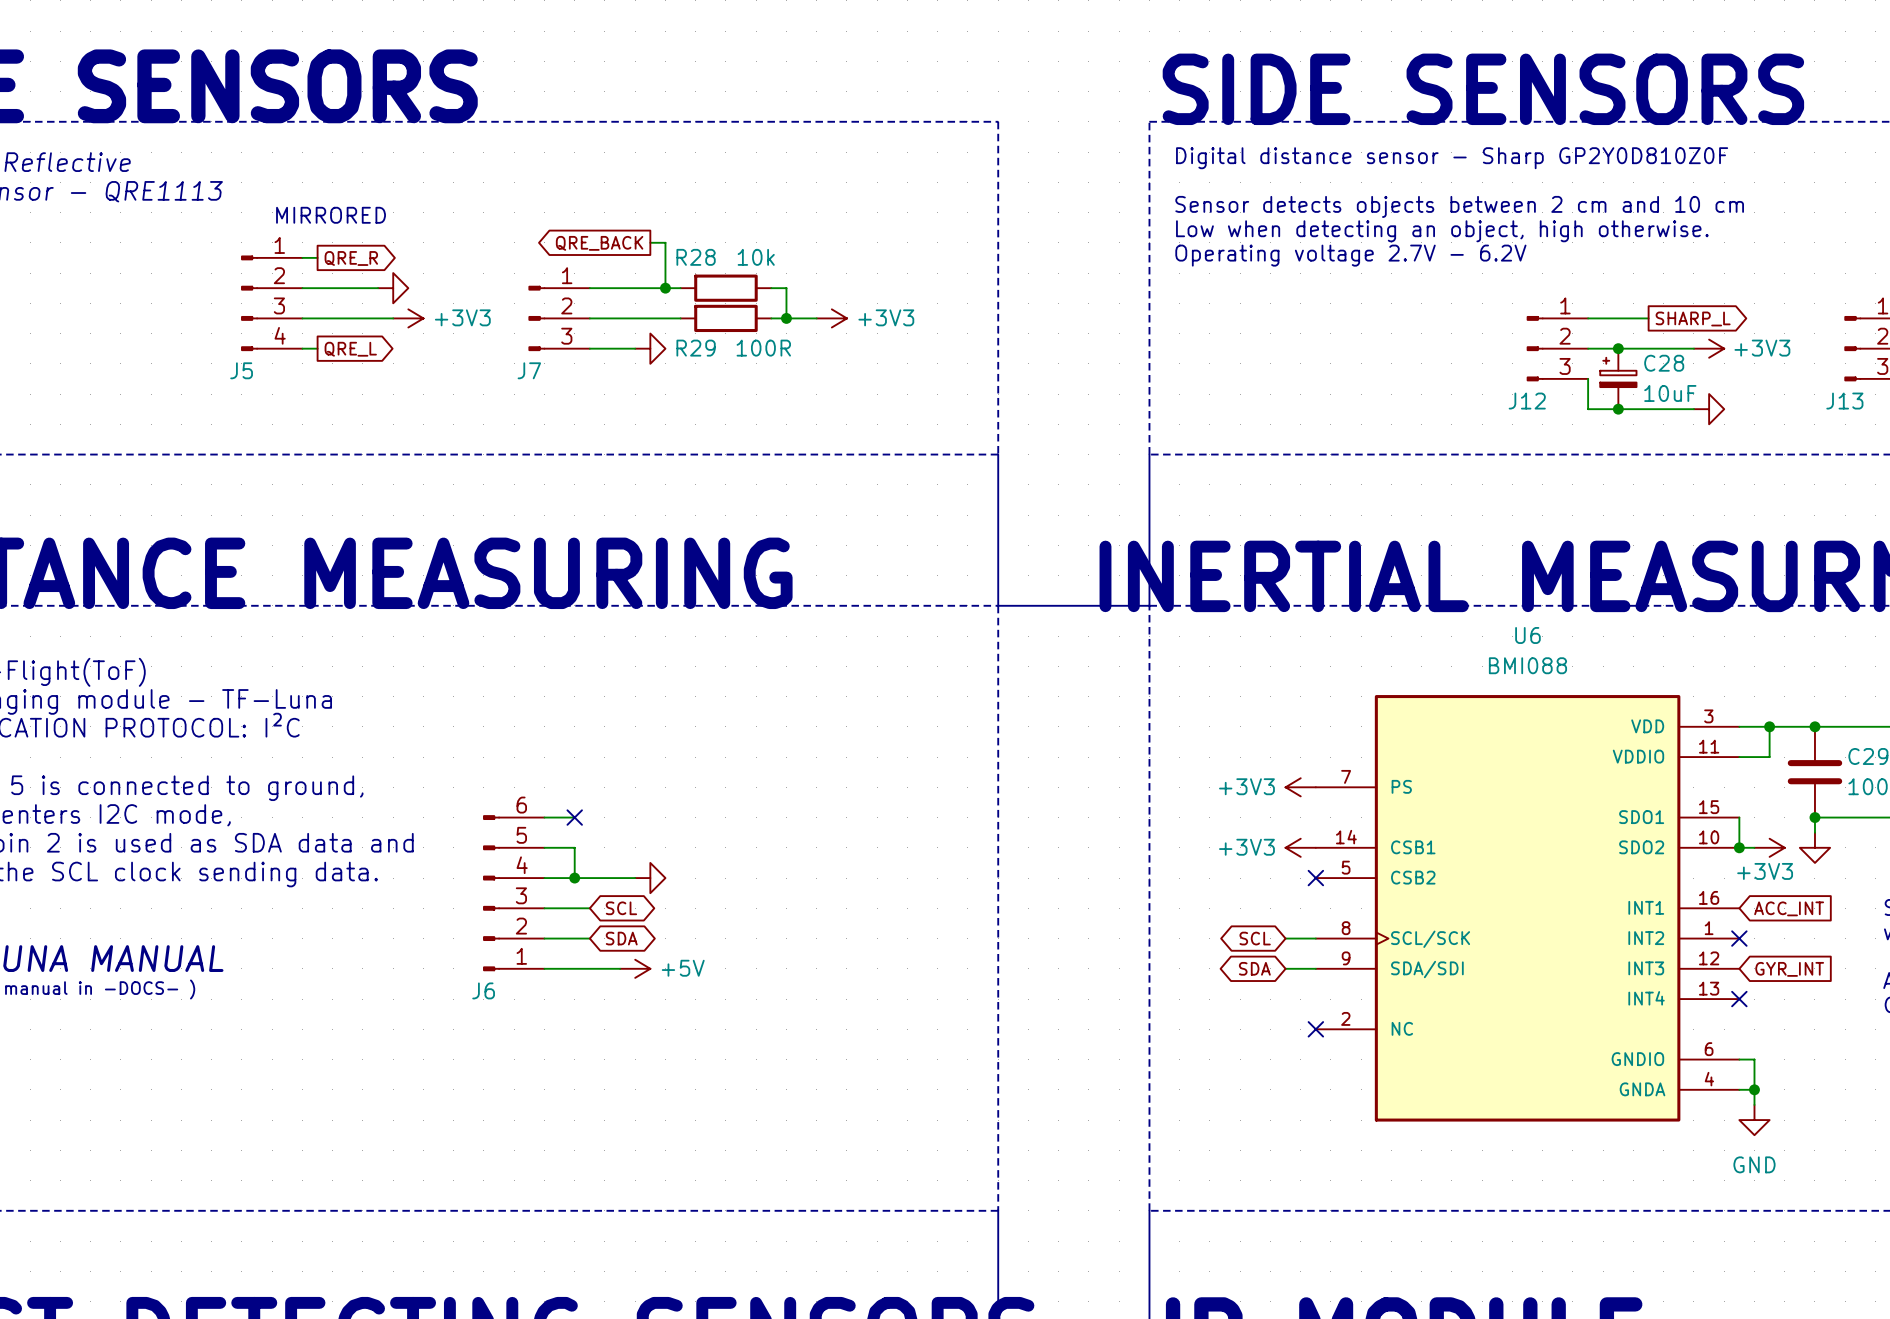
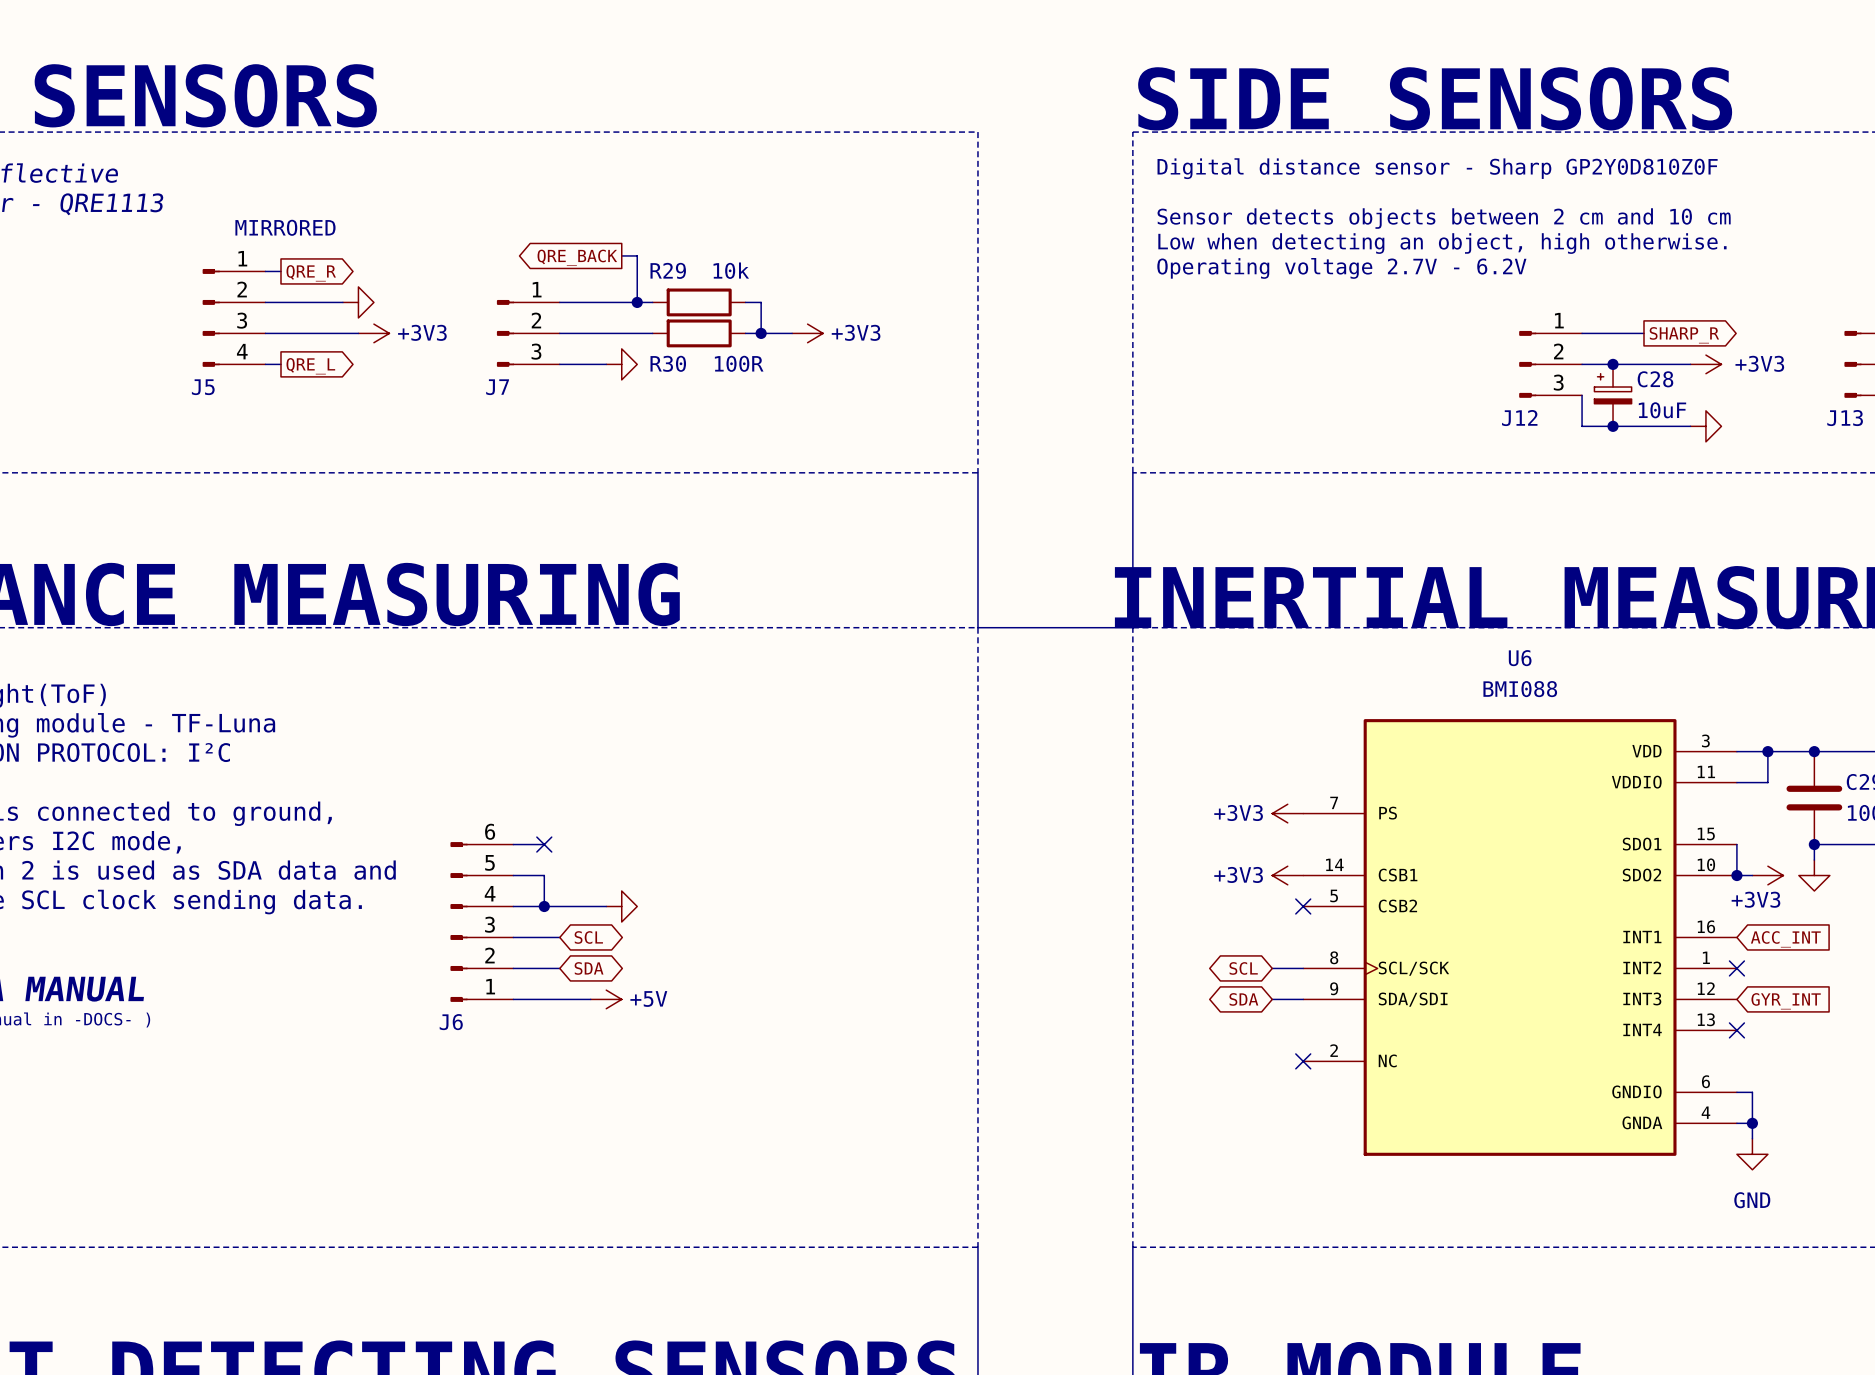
R28 name: R28 (696, 257) -> R29 (668, 270)
global label: SHARP_L (1693, 318) -> SHARP_R (1684, 335)
R29 name: R29 (696, 348) -> R30 (668, 363)

